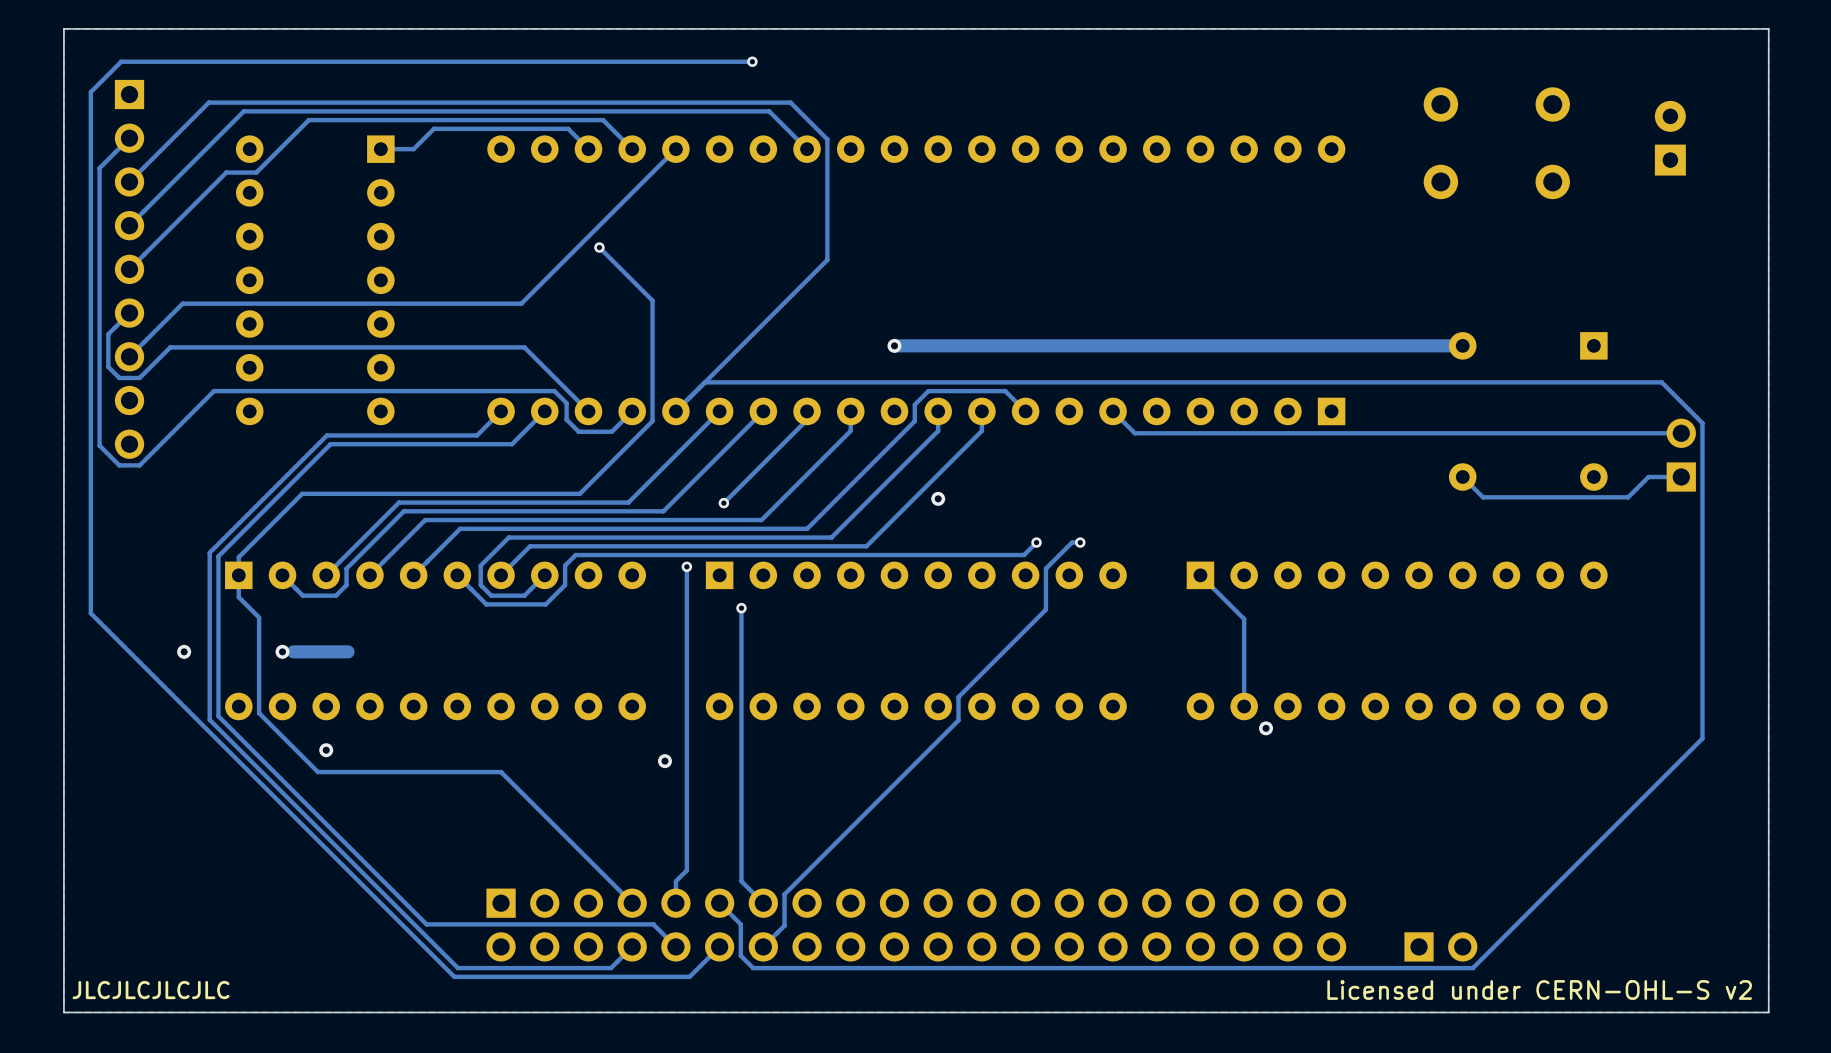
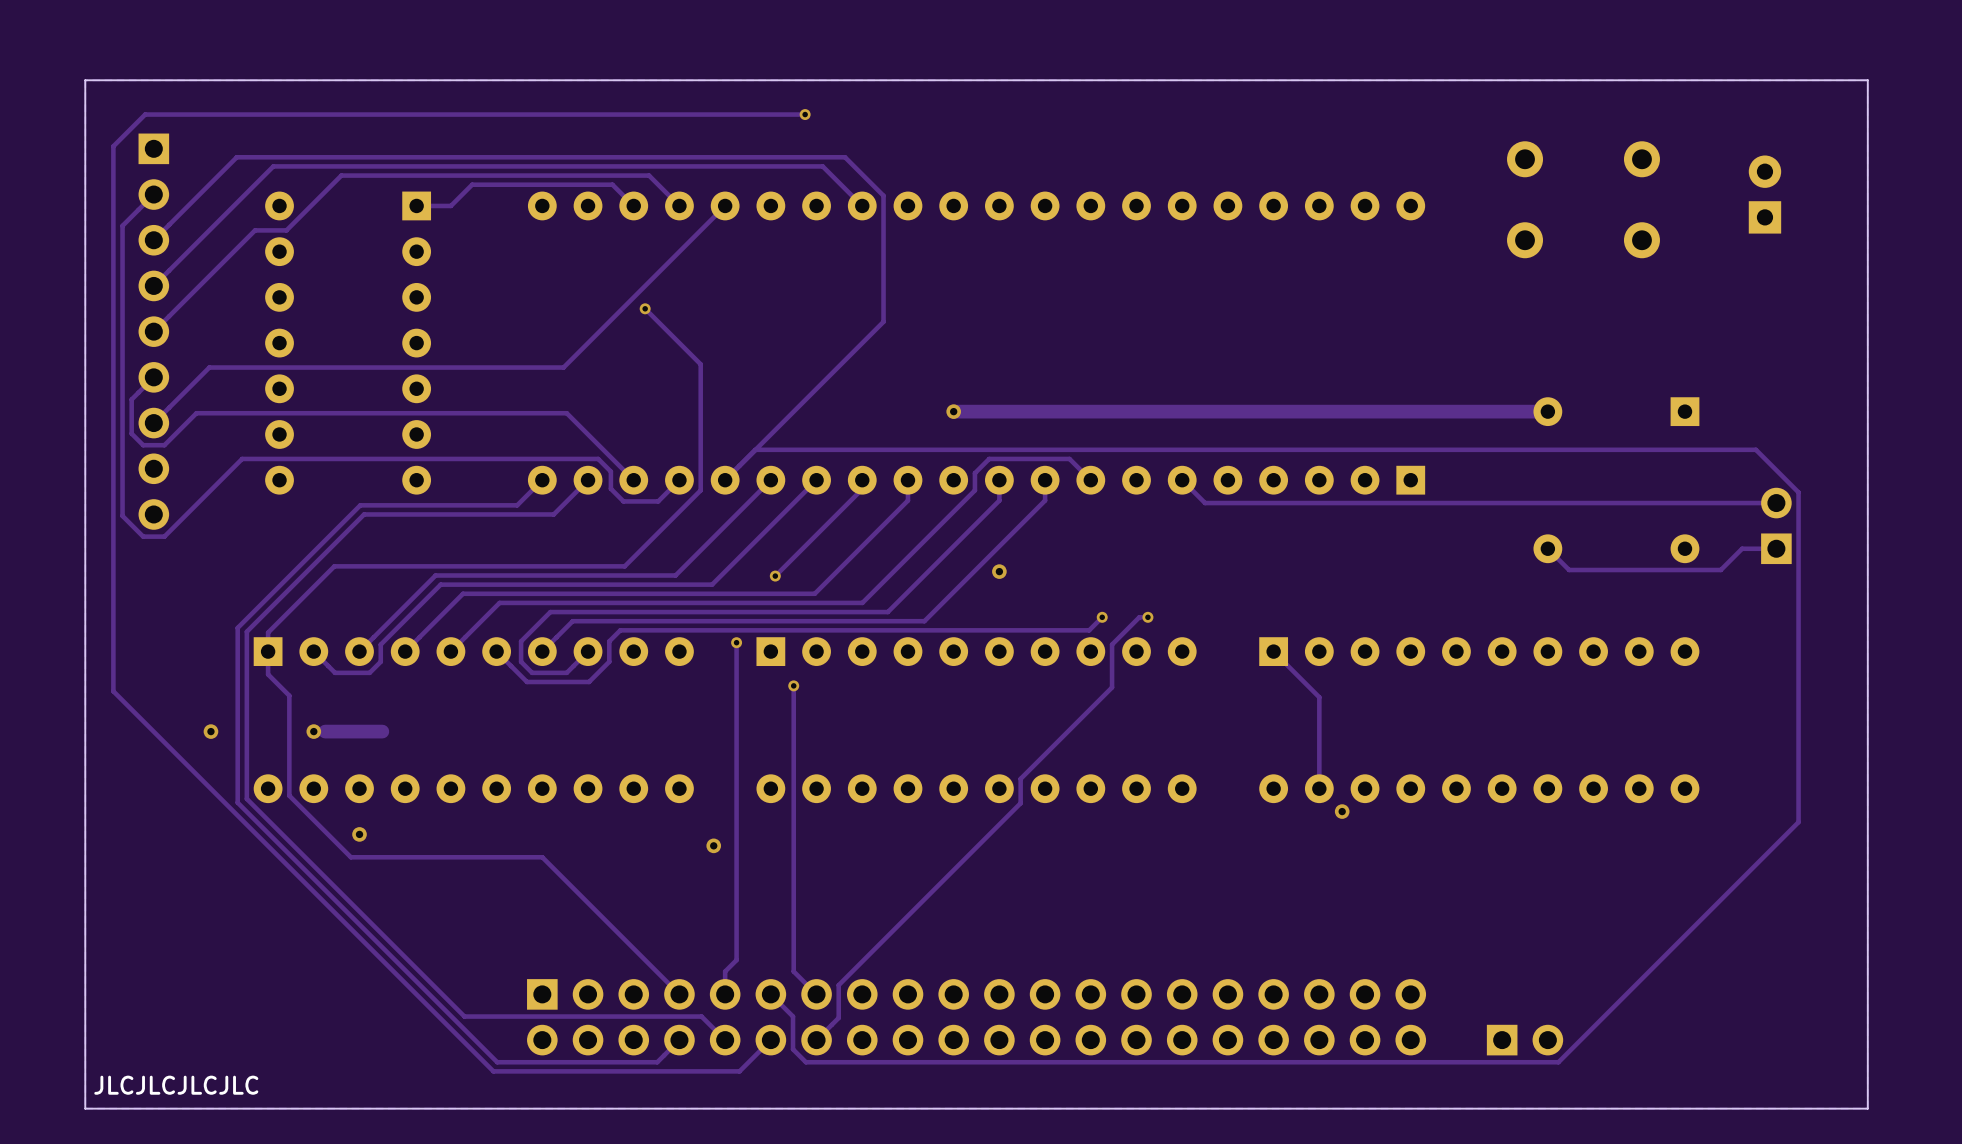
text: Licensed under CERN-OHL-S v2 (1539, 989) -> none

